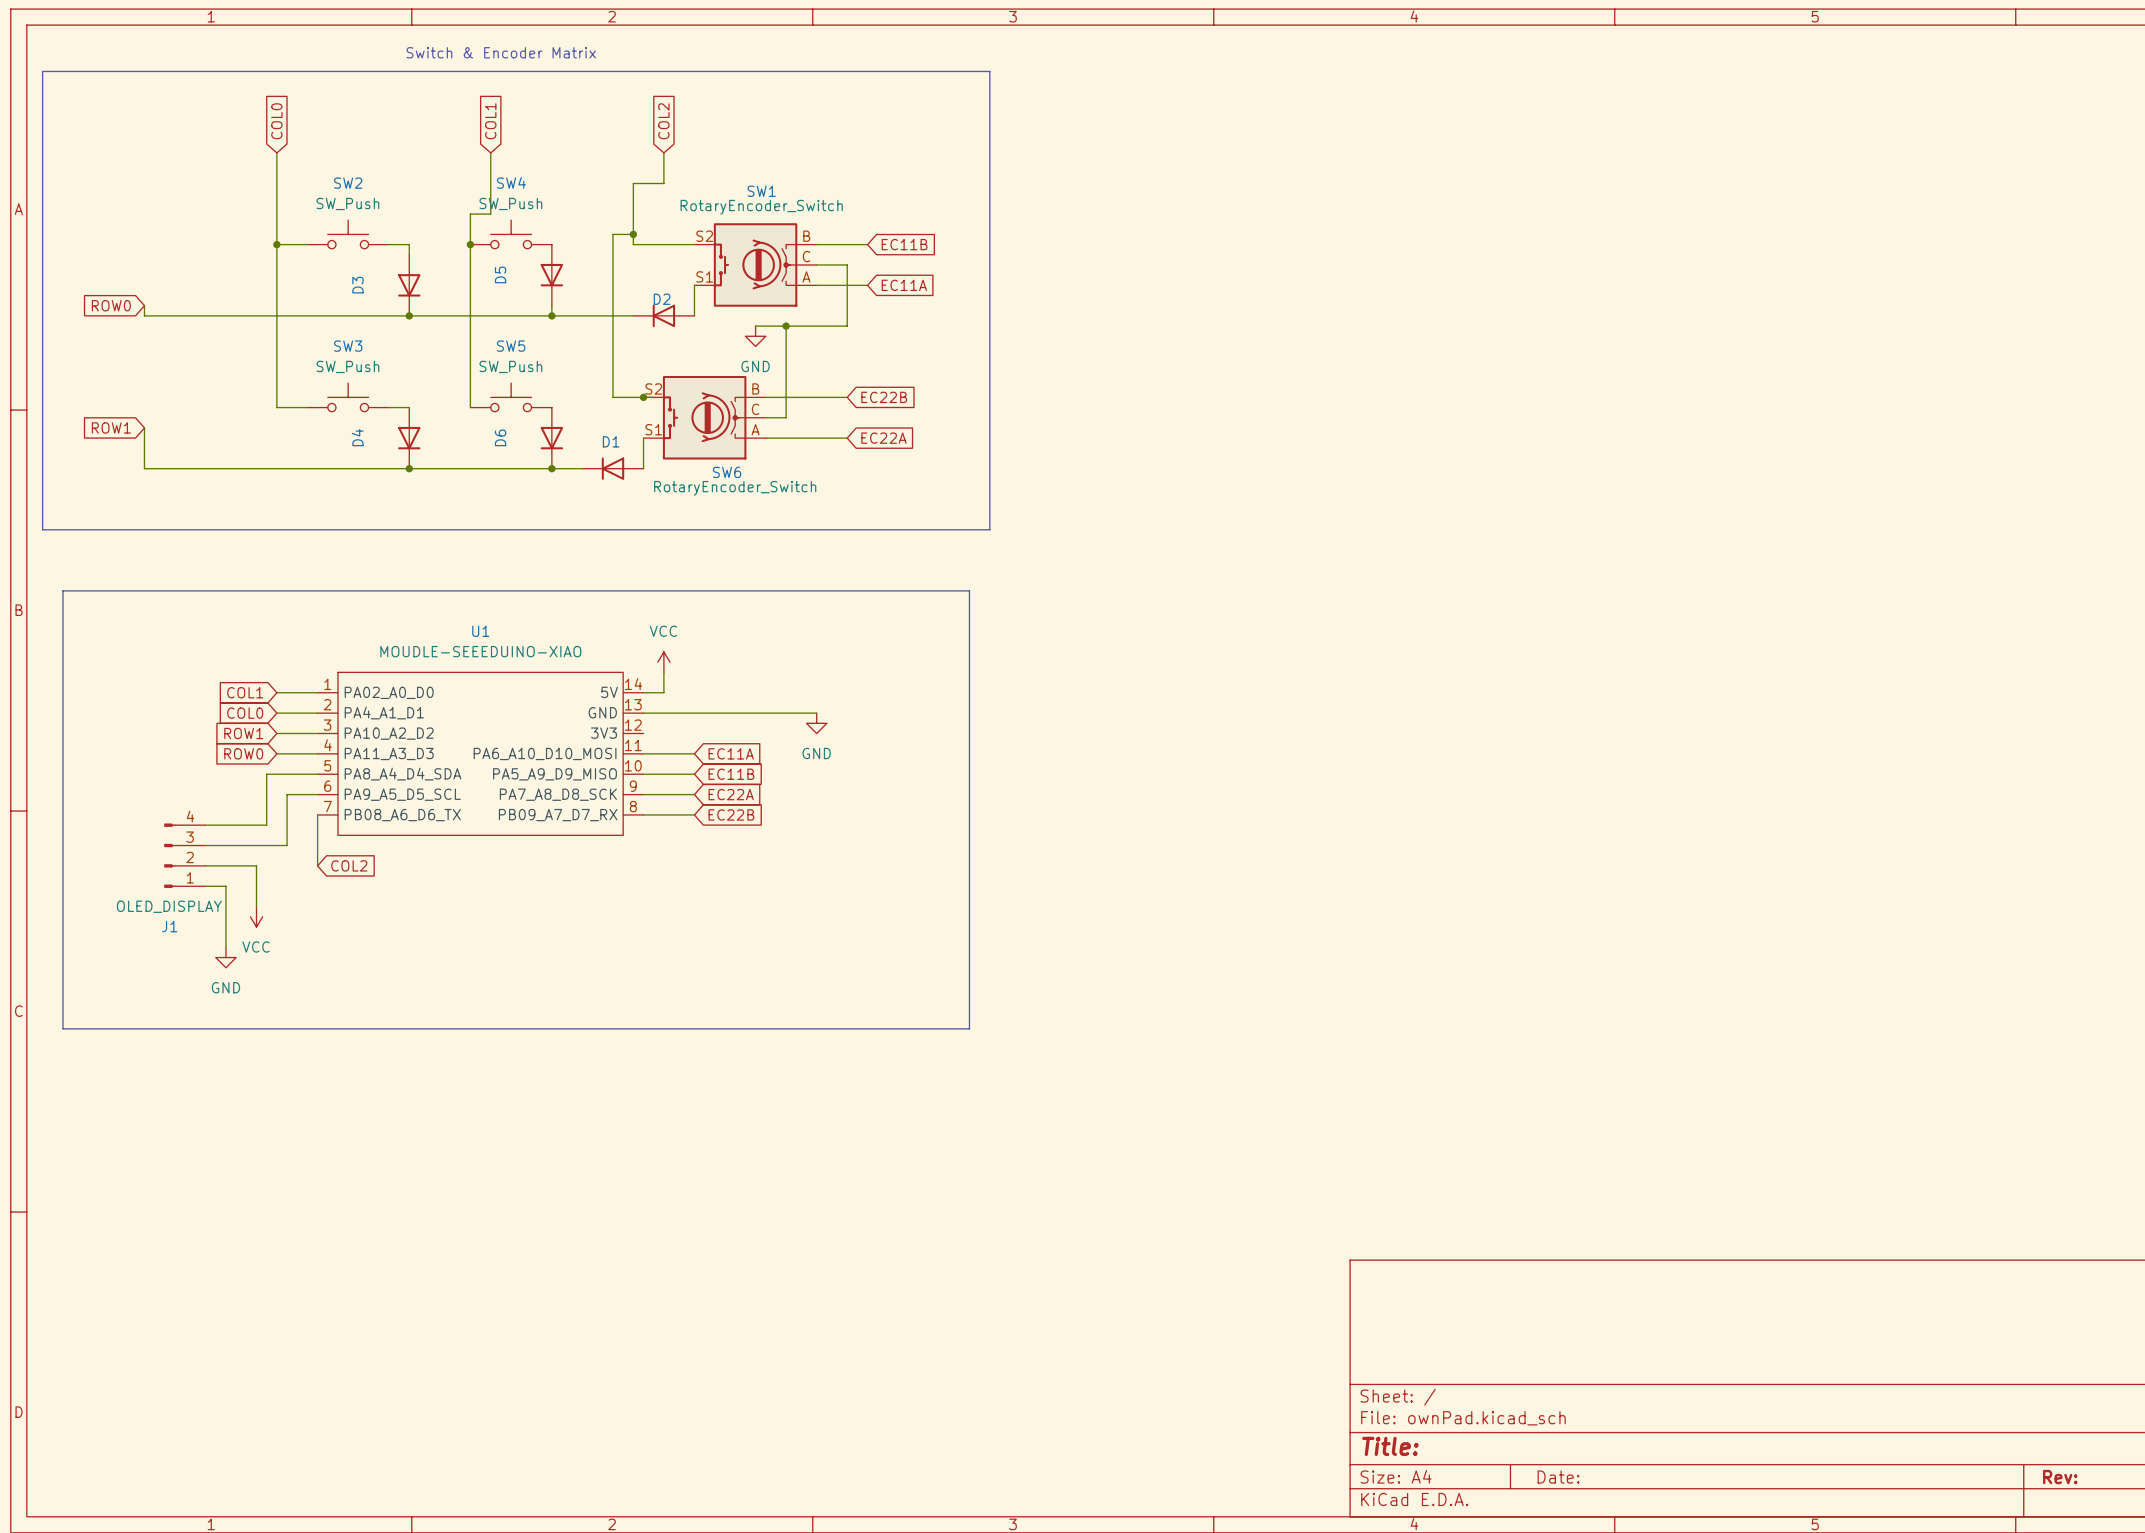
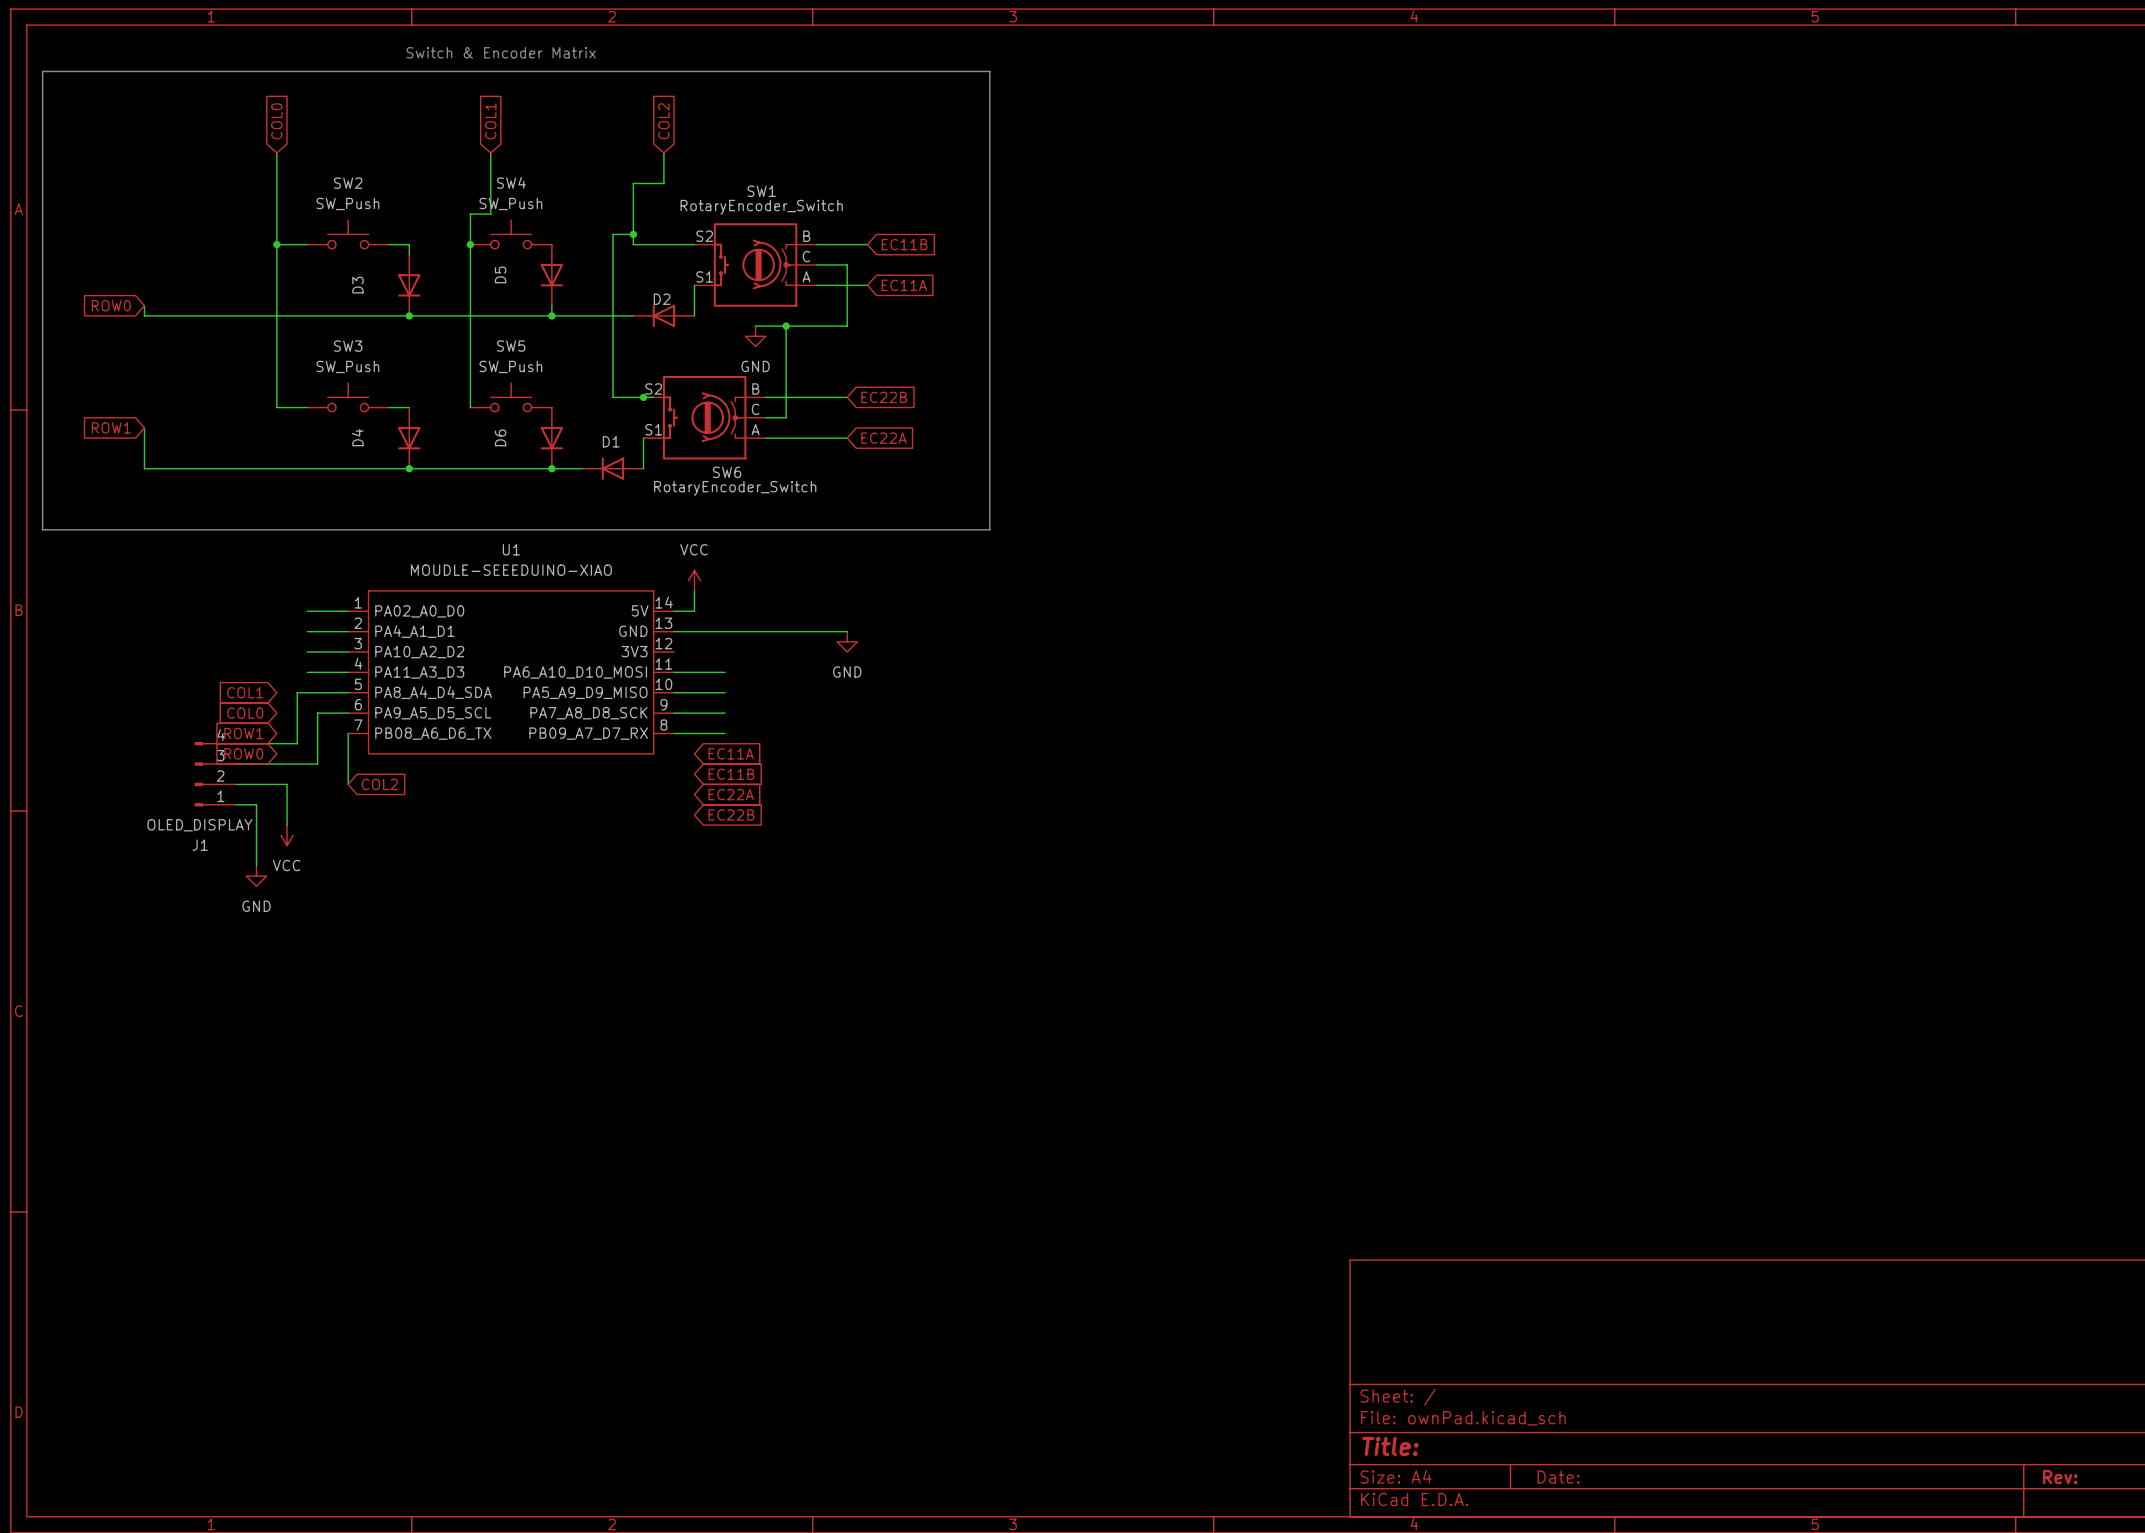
line: (62, 590) (969, 590) (969, 1028) (62, 1028) (62, 590) -> none
wire: none -> (307, 611) (348, 611)
wire: none -> (674, 631) (847, 631)
power symbol position: VCC (663, 662) -> VCC (694, 580)
wire: (663, 672) (663, 692) (643, 692) -> (694, 590) (694, 611) (674, 611)
wire: (276, 692) (297, 692) -> (236, 743) (297, 743) (297, 692)
wire: (276, 713) (317, 713) -> (307, 631) (348, 631)
wire: none -> (348, 713) (317, 713) (317, 764) (236, 764)
wire: (725, 713) (816, 713) -> none
power symbol position: GND (816, 723) -> GND (847, 641)
wire: (276, 733) (317, 733) -> (307, 652) (348, 652)
wire: (276, 753) (317, 753) -> (307, 672) (348, 672)
U1 position: (480, 753) -> (511, 672)
wire: (643, 753) (694, 753) -> (674, 672) (725, 672)
wire: (317, 774) (266, 774) (266, 825) (205, 825) -> none
wire: (643, 774) (694, 774) -> (674, 692) (725, 692)
wire: (287, 794) (317, 794) -> (287, 794) (287, 784) (236, 784)
wire: (643, 794) (694, 794) -> none
wire: (317, 814) (317, 865) -> (348, 733) (348, 784)
wire: (643, 814) (694, 814) -> (674, 733) (725, 733)
wire: (287, 825) (287, 845) (205, 845) -> none
J1 position: (184, 855) -> (215, 774)
wire: (205, 865) (256, 865) (256, 906) -> none
global label position: COL2 (349, 865) -> COL2 (379, 784)
wire: (205, 886) (225, 886) (225, 947) -> (236, 804) (256, 804) (256, 865)
power symbol position: VCC (256, 916) -> VCC (287, 835)
power symbol position: GND (225, 957) -> GND (256, 876)

